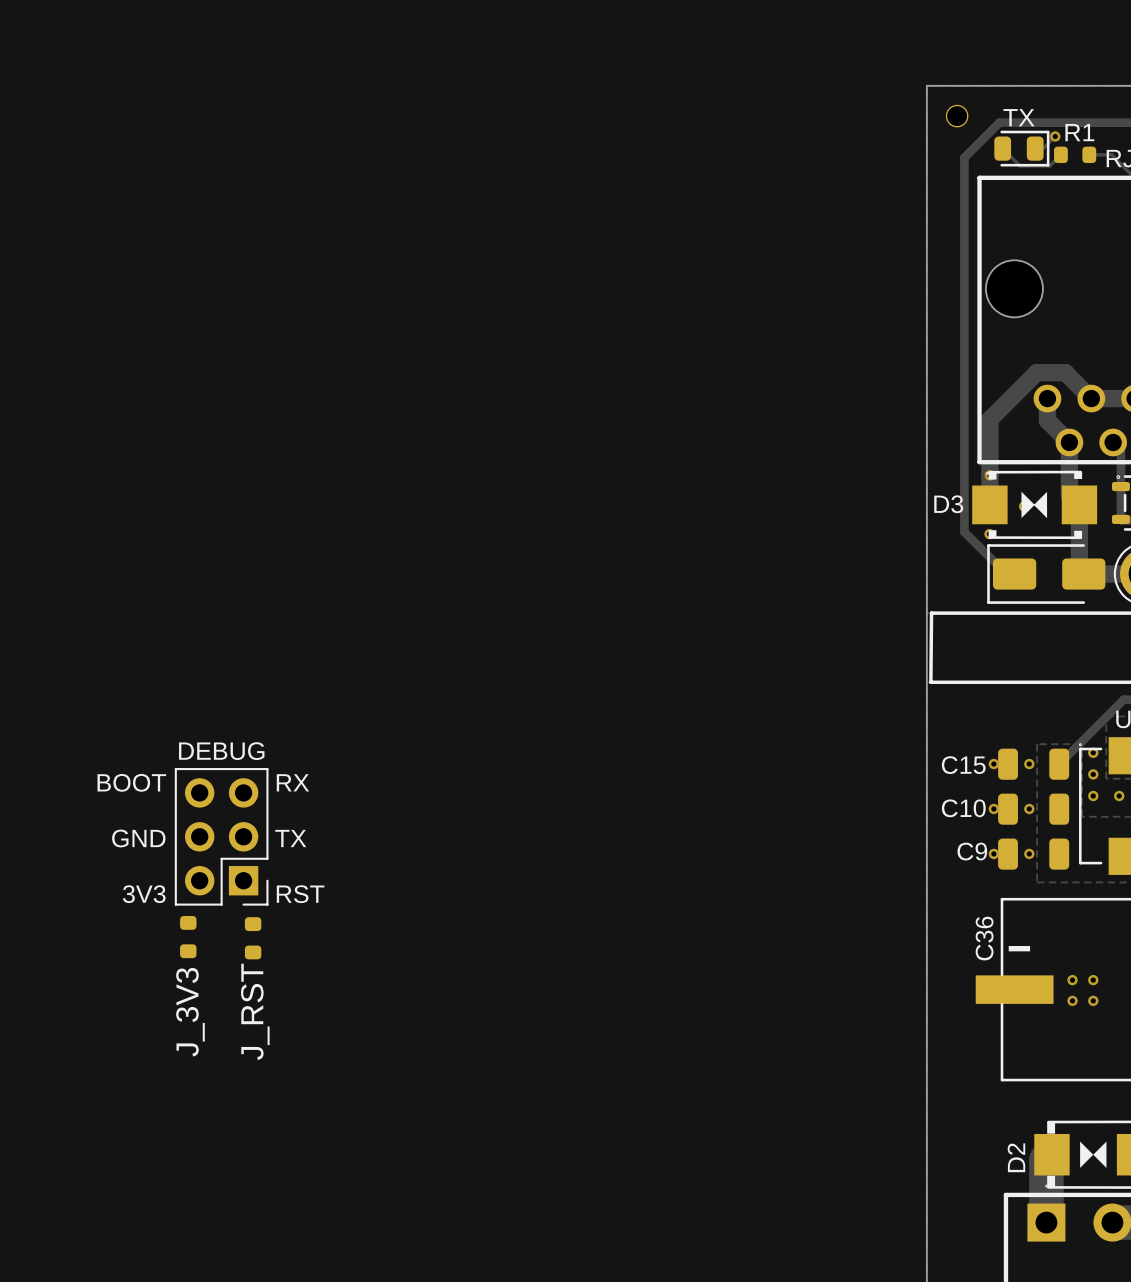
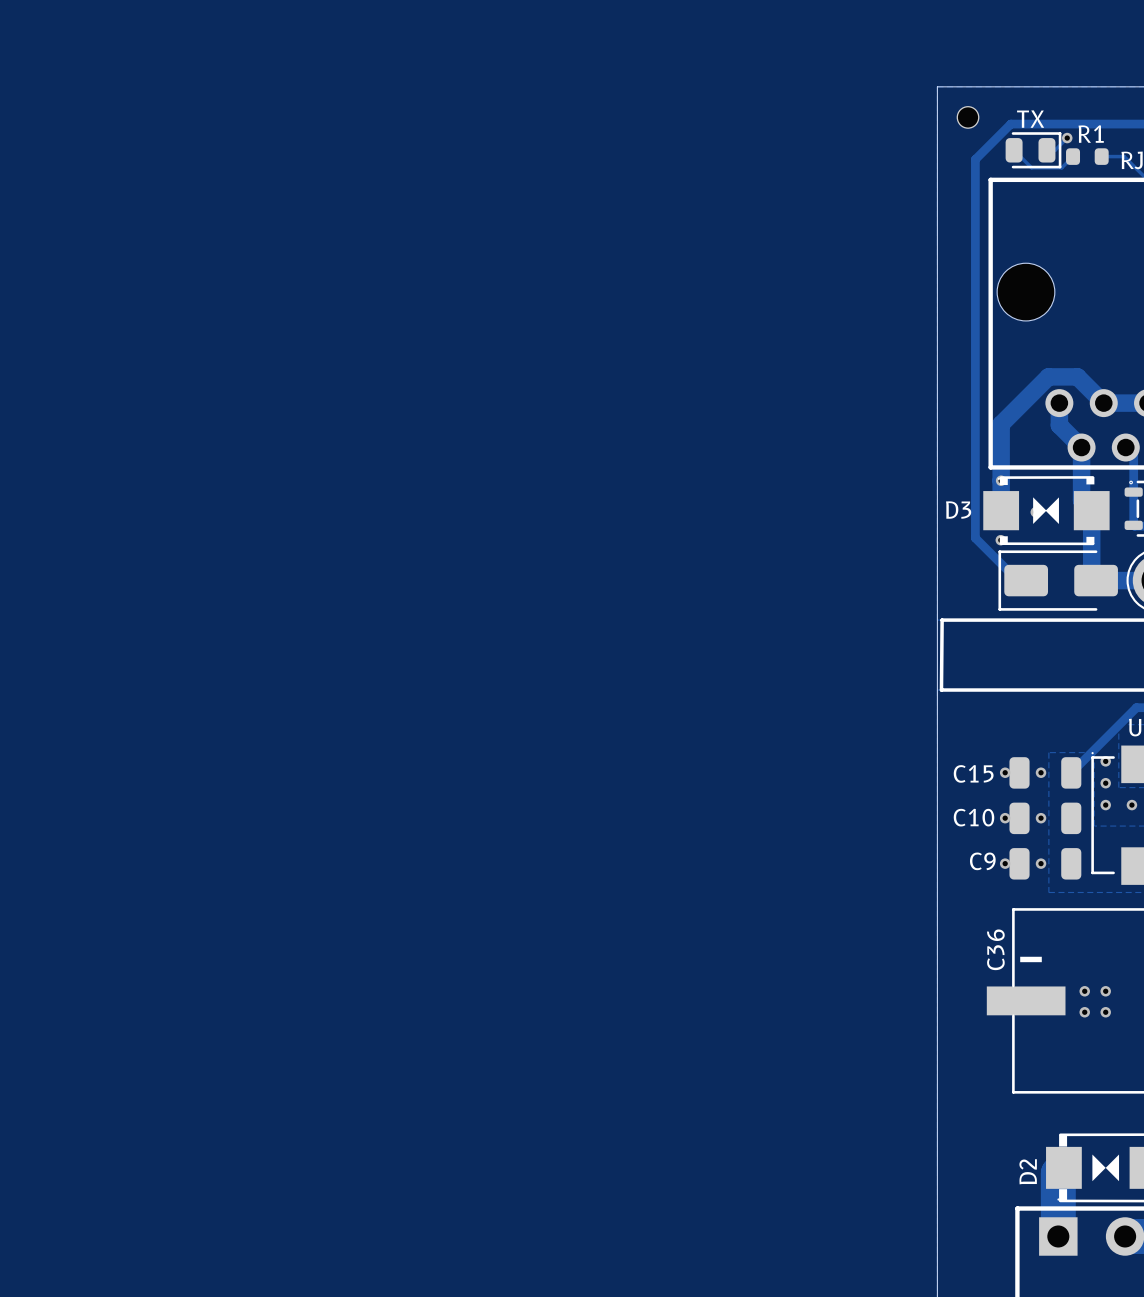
text: BOOT (131, 782) -> none
text: RX (292, 782) -> none
part: DEBUG (221, 836) -> none
text: GND (138, 838) -> none
text: TX (290, 838) -> none
text: 3V3 (144, 894) -> none
text: RST (300, 894) -> none
part: (188, 937) -> none
part: (253, 938) -> none

